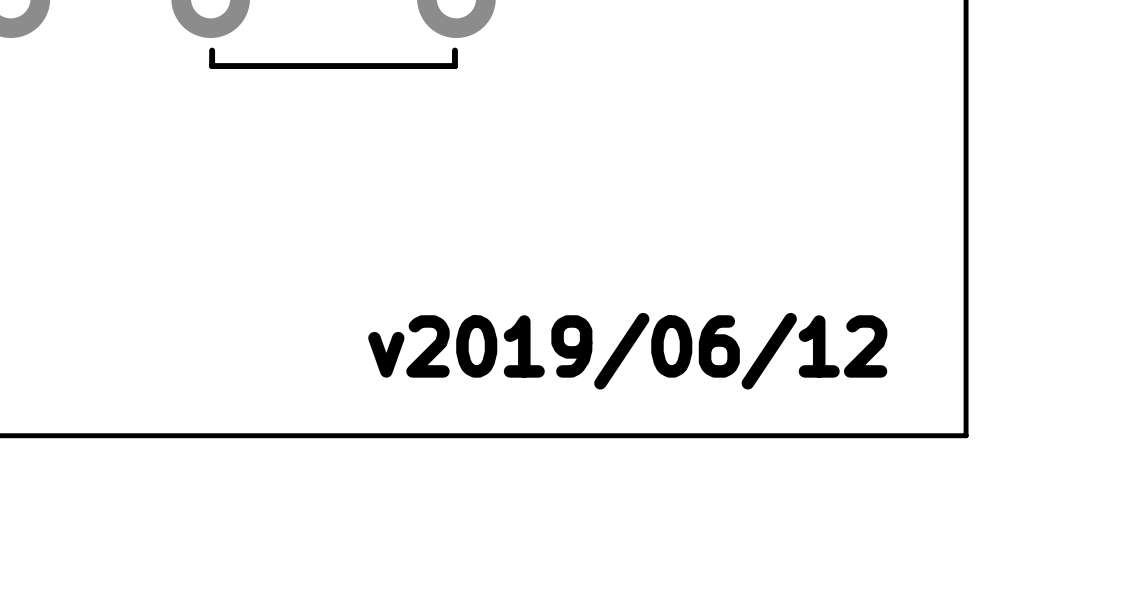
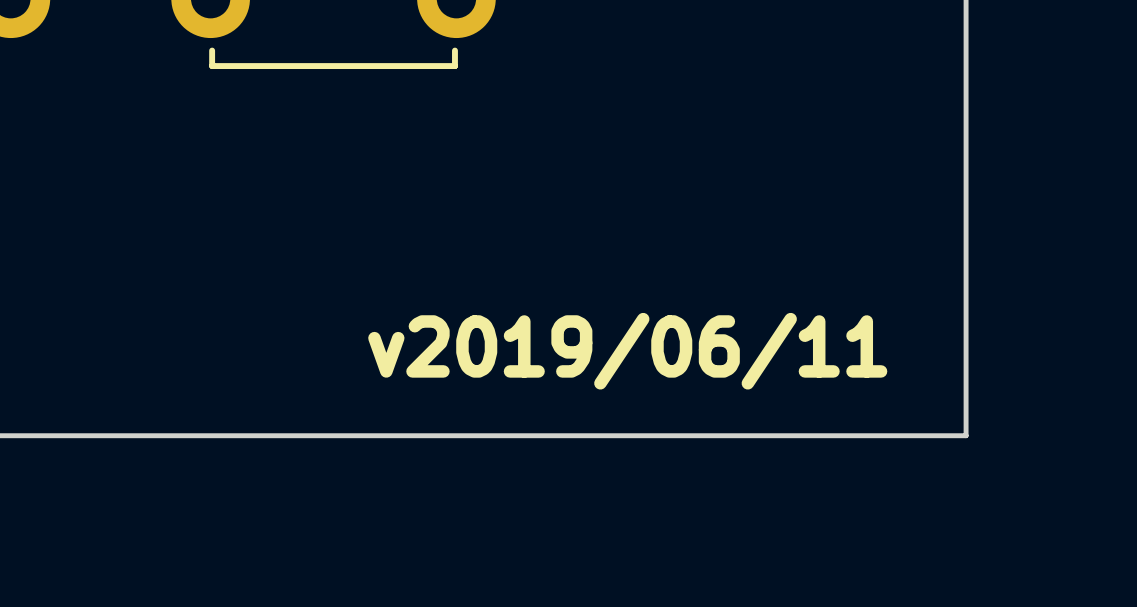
text: v2019/06/12 (627, 351) -> v2019/06/11 (627, 351)

